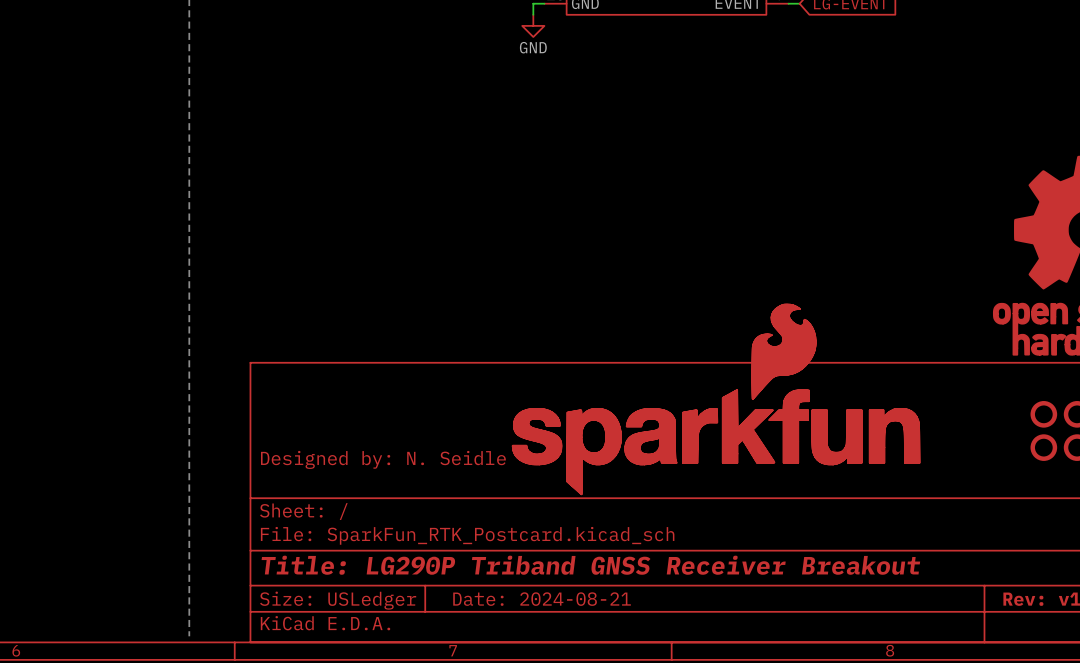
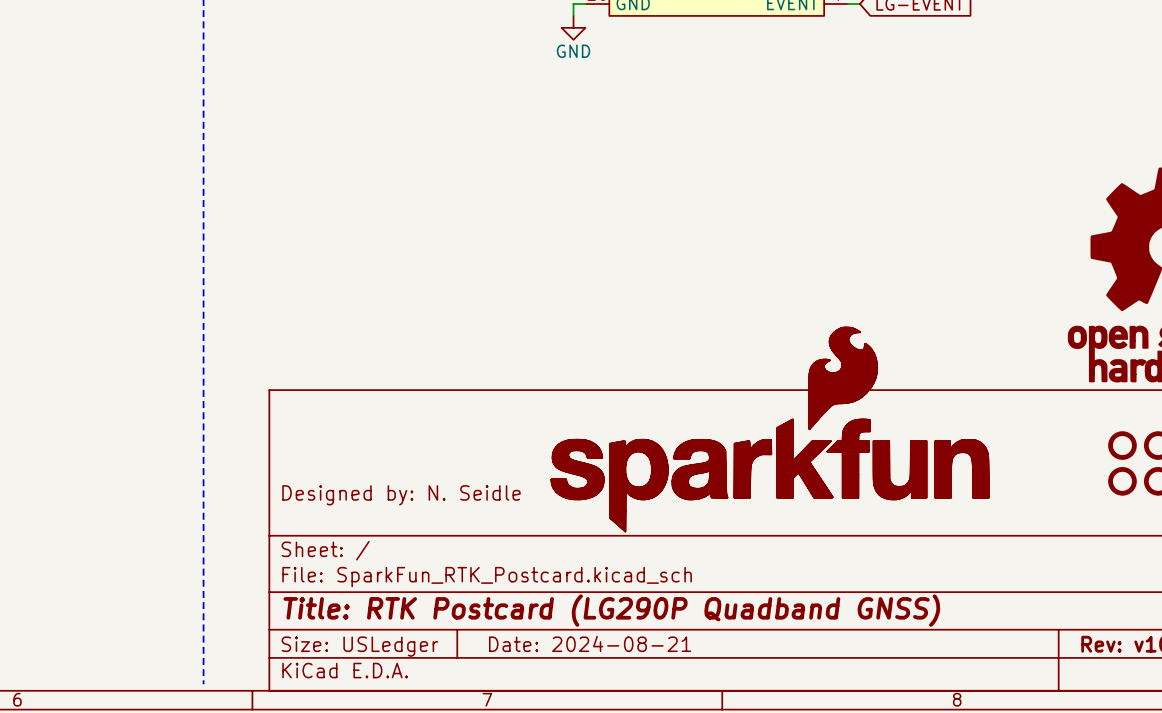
title block: Title: LG290P Triband GNSS Receiver Breakout (590, 565) -> Title: RTK Postcard (LG290P Quadband GNSS) (611, 610)

